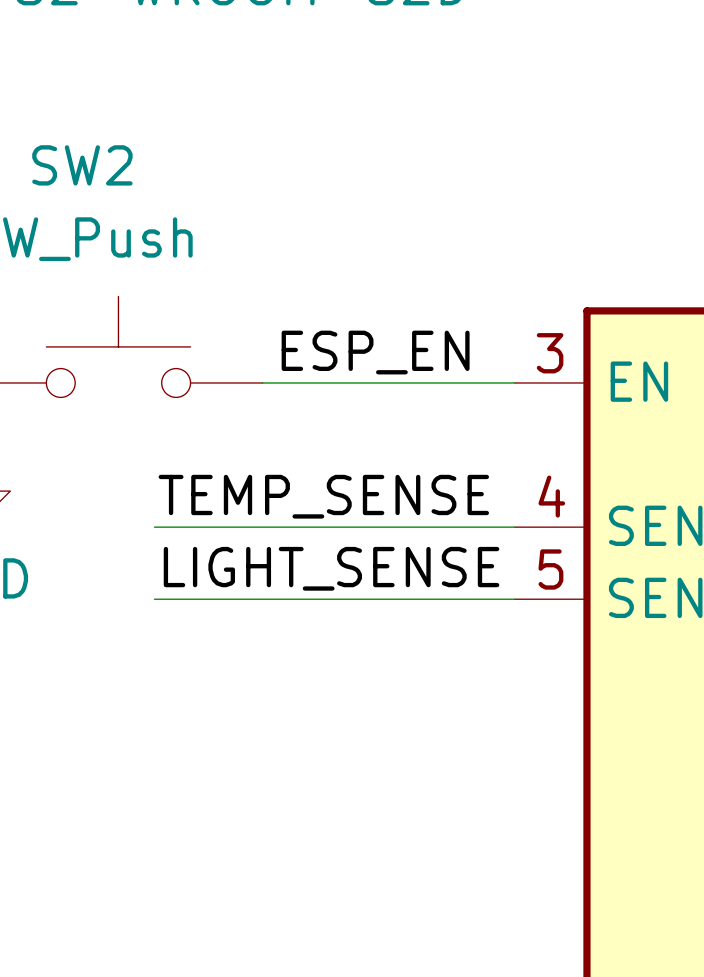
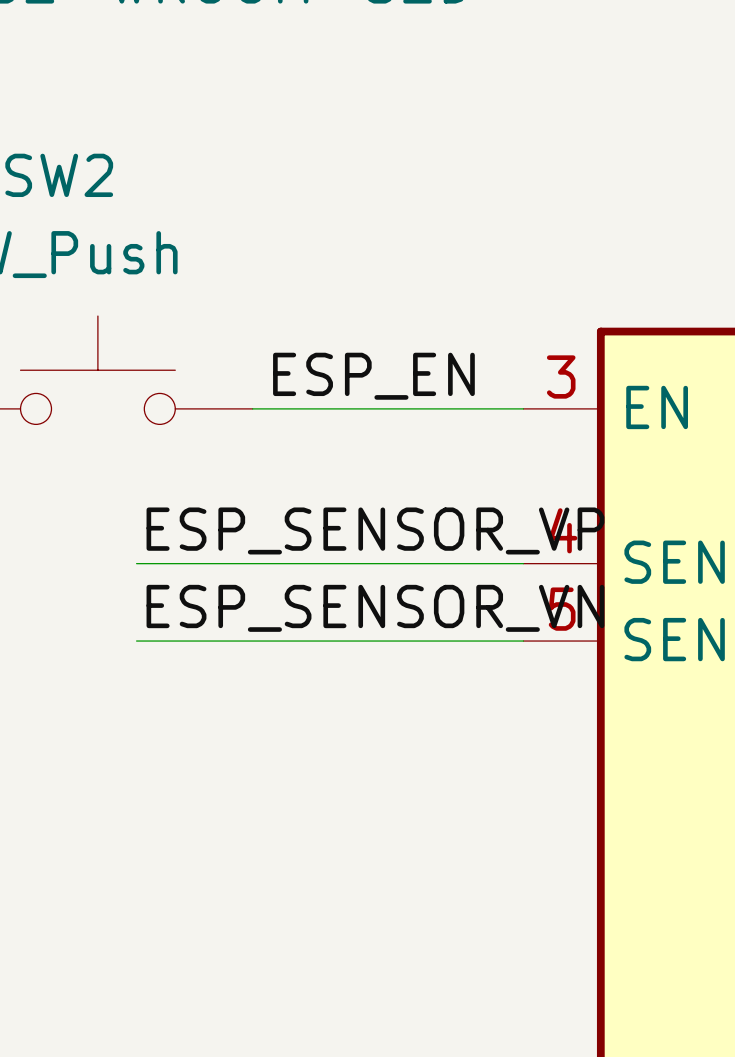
label: TEMP_SENSE (323, 496) -> ESP_SENSOR_VP (375, 530)
label: LIGHT_SENSE (331, 568) -> ESP_SENSOR_VN (375, 608)

